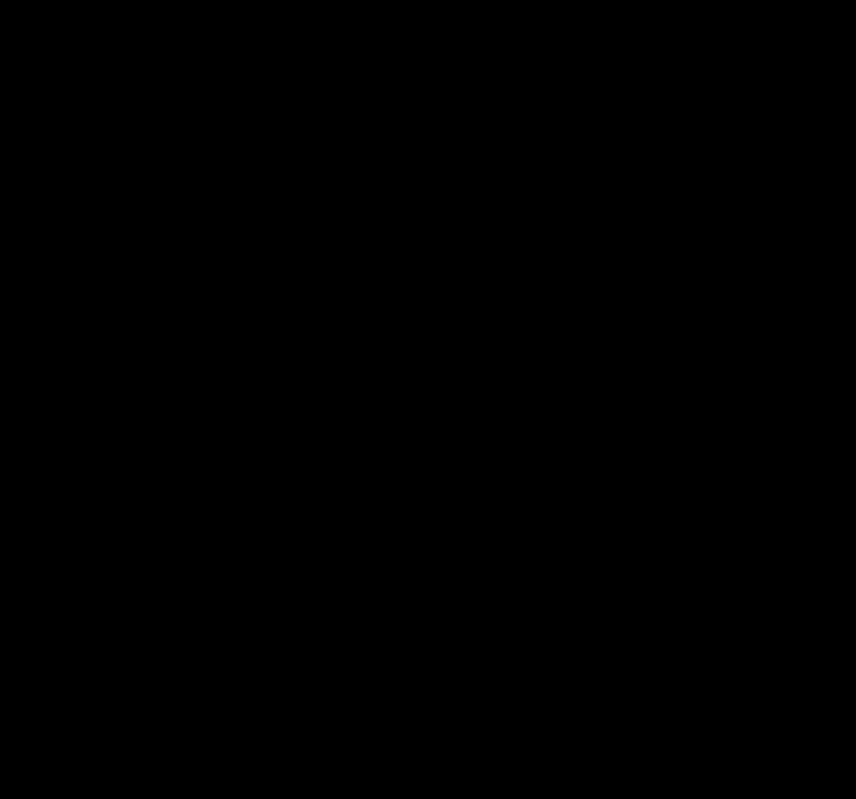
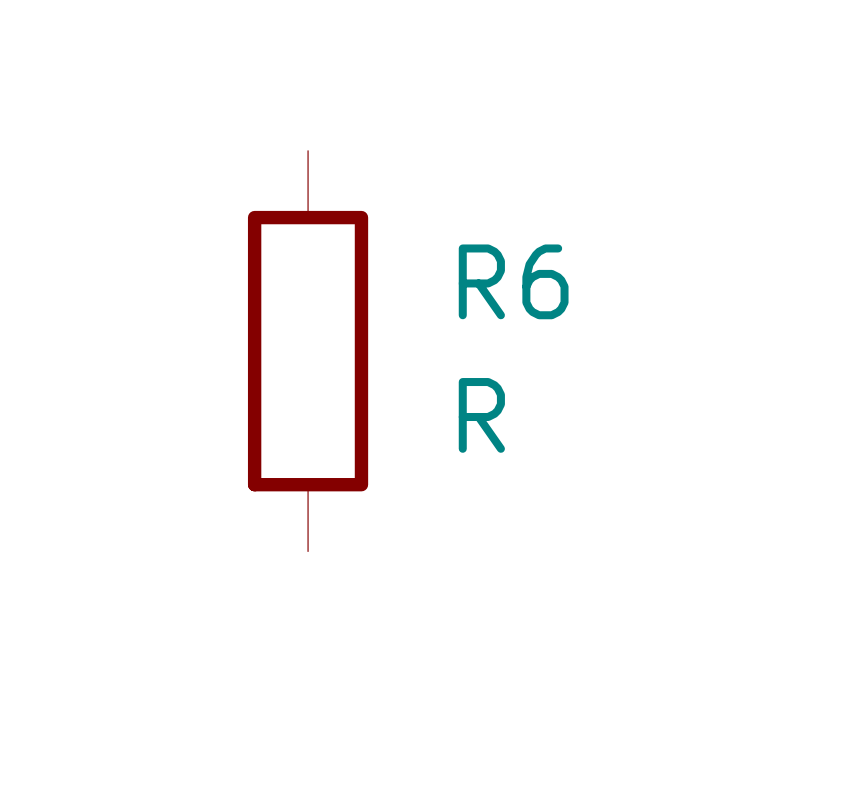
R6: none -> R (308, 351)

